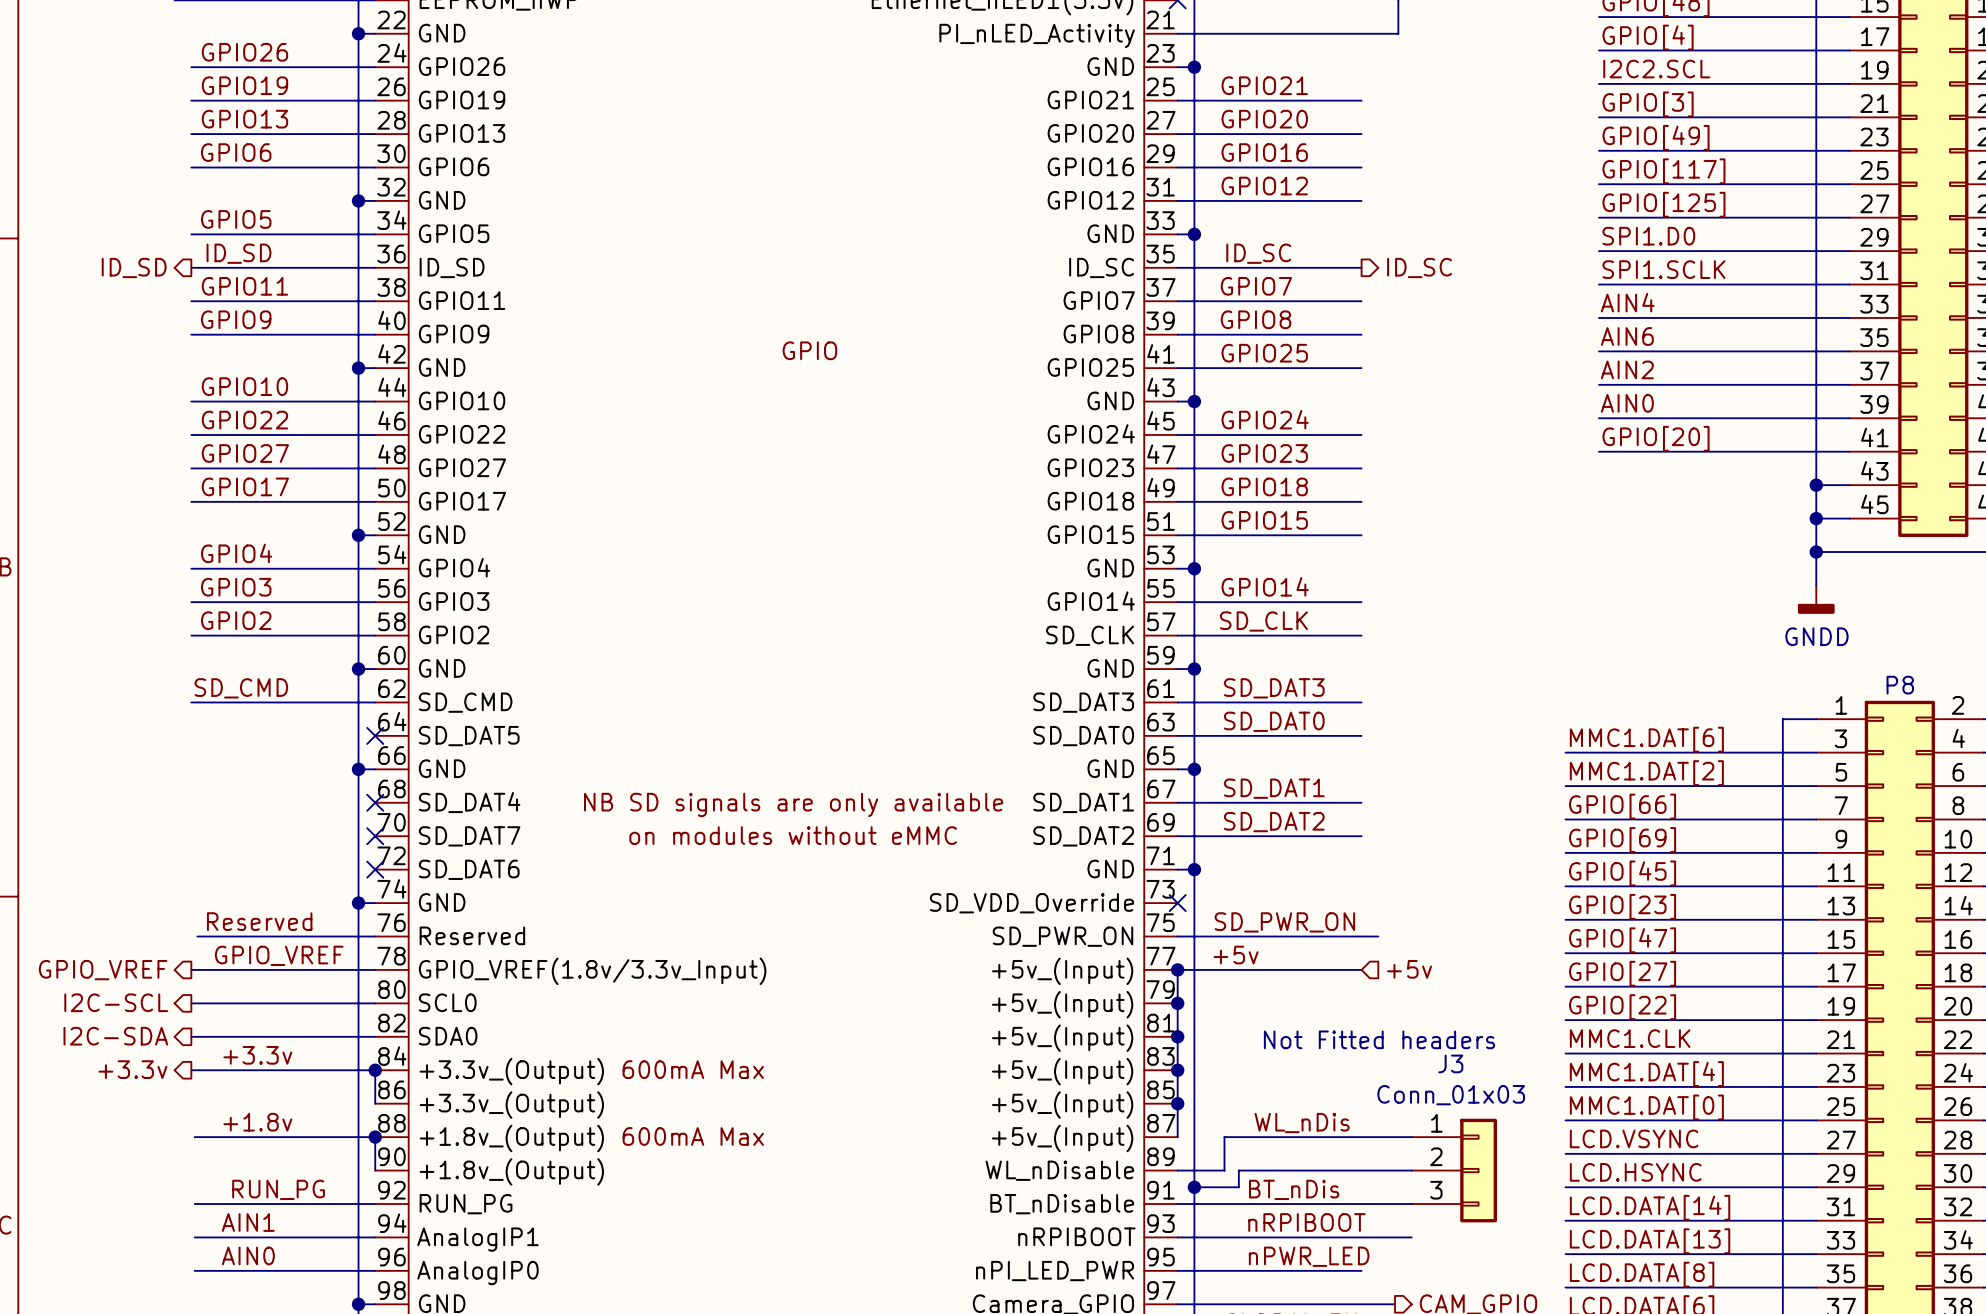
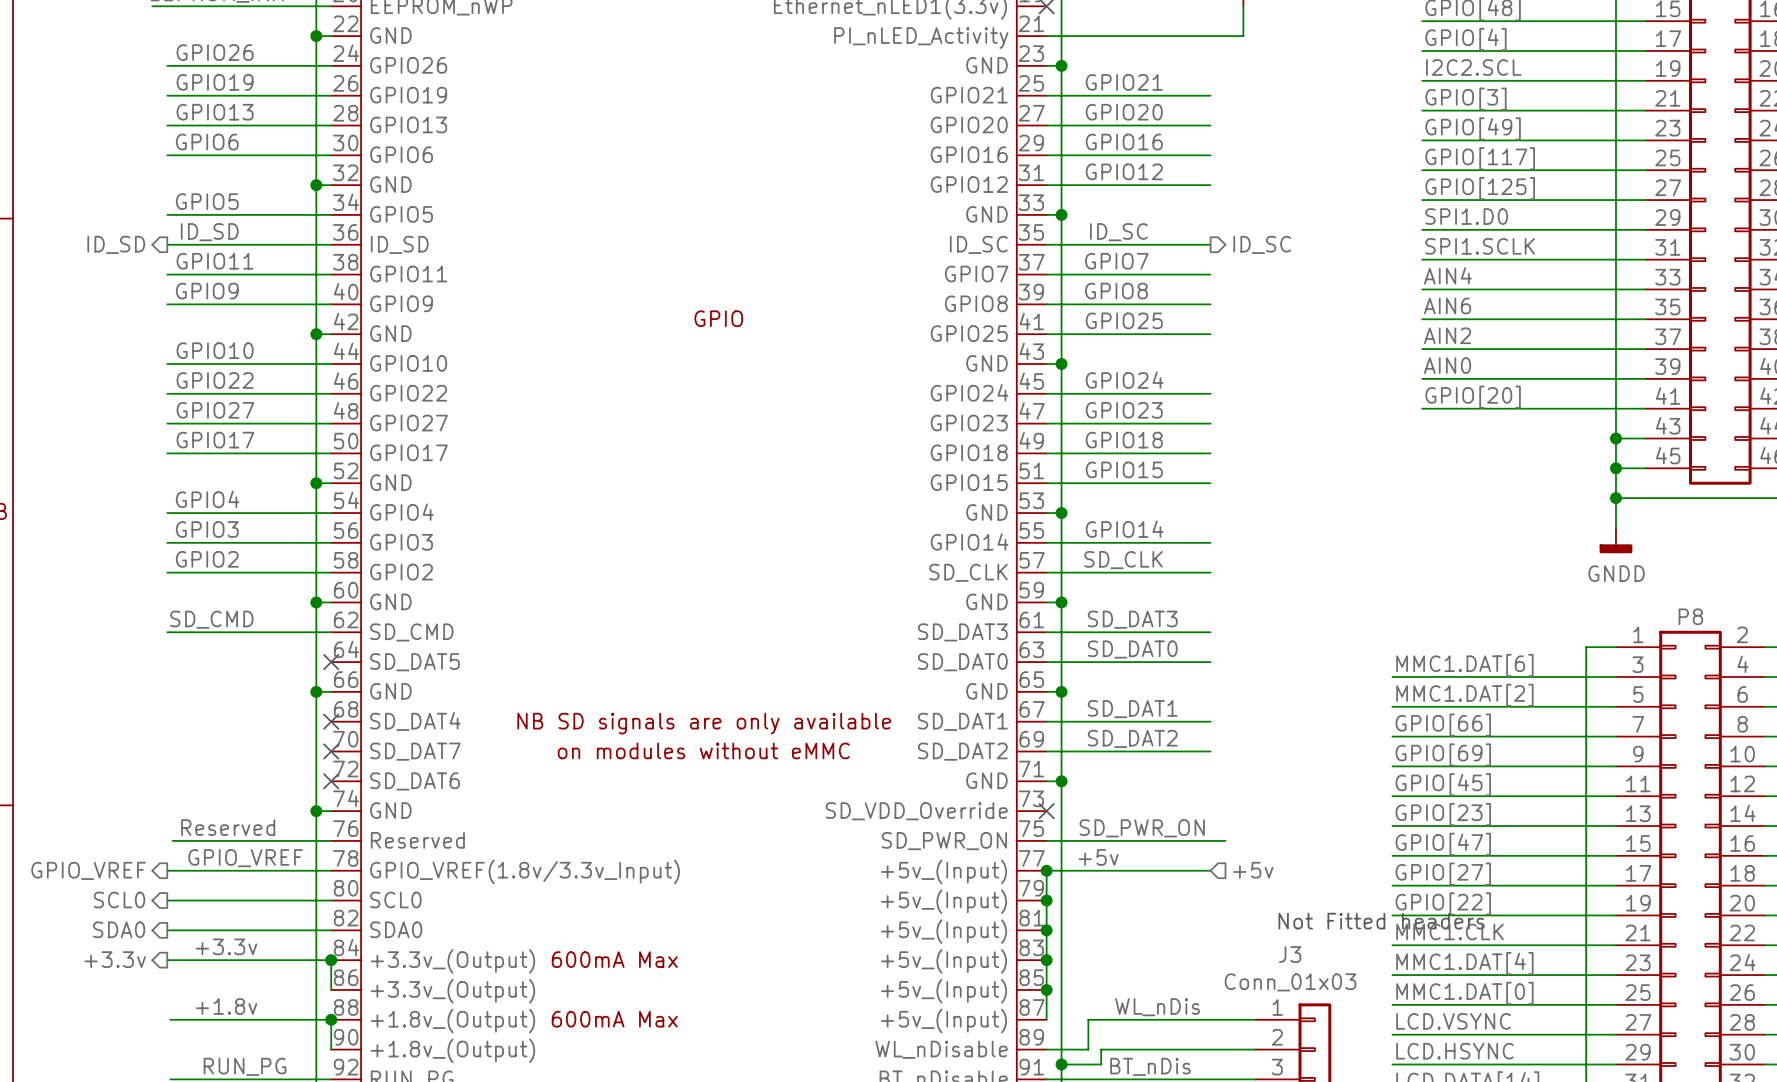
hierarchical label: I2C-SCL (116, 1002) -> SCL0 (119, 899)
hierarchical label: I2C-SDA (115, 1036) -> SDA0 (119, 929)
text position: Not Fitted headers (1379, 1039) -> Not Fitted headers (1381, 921)

